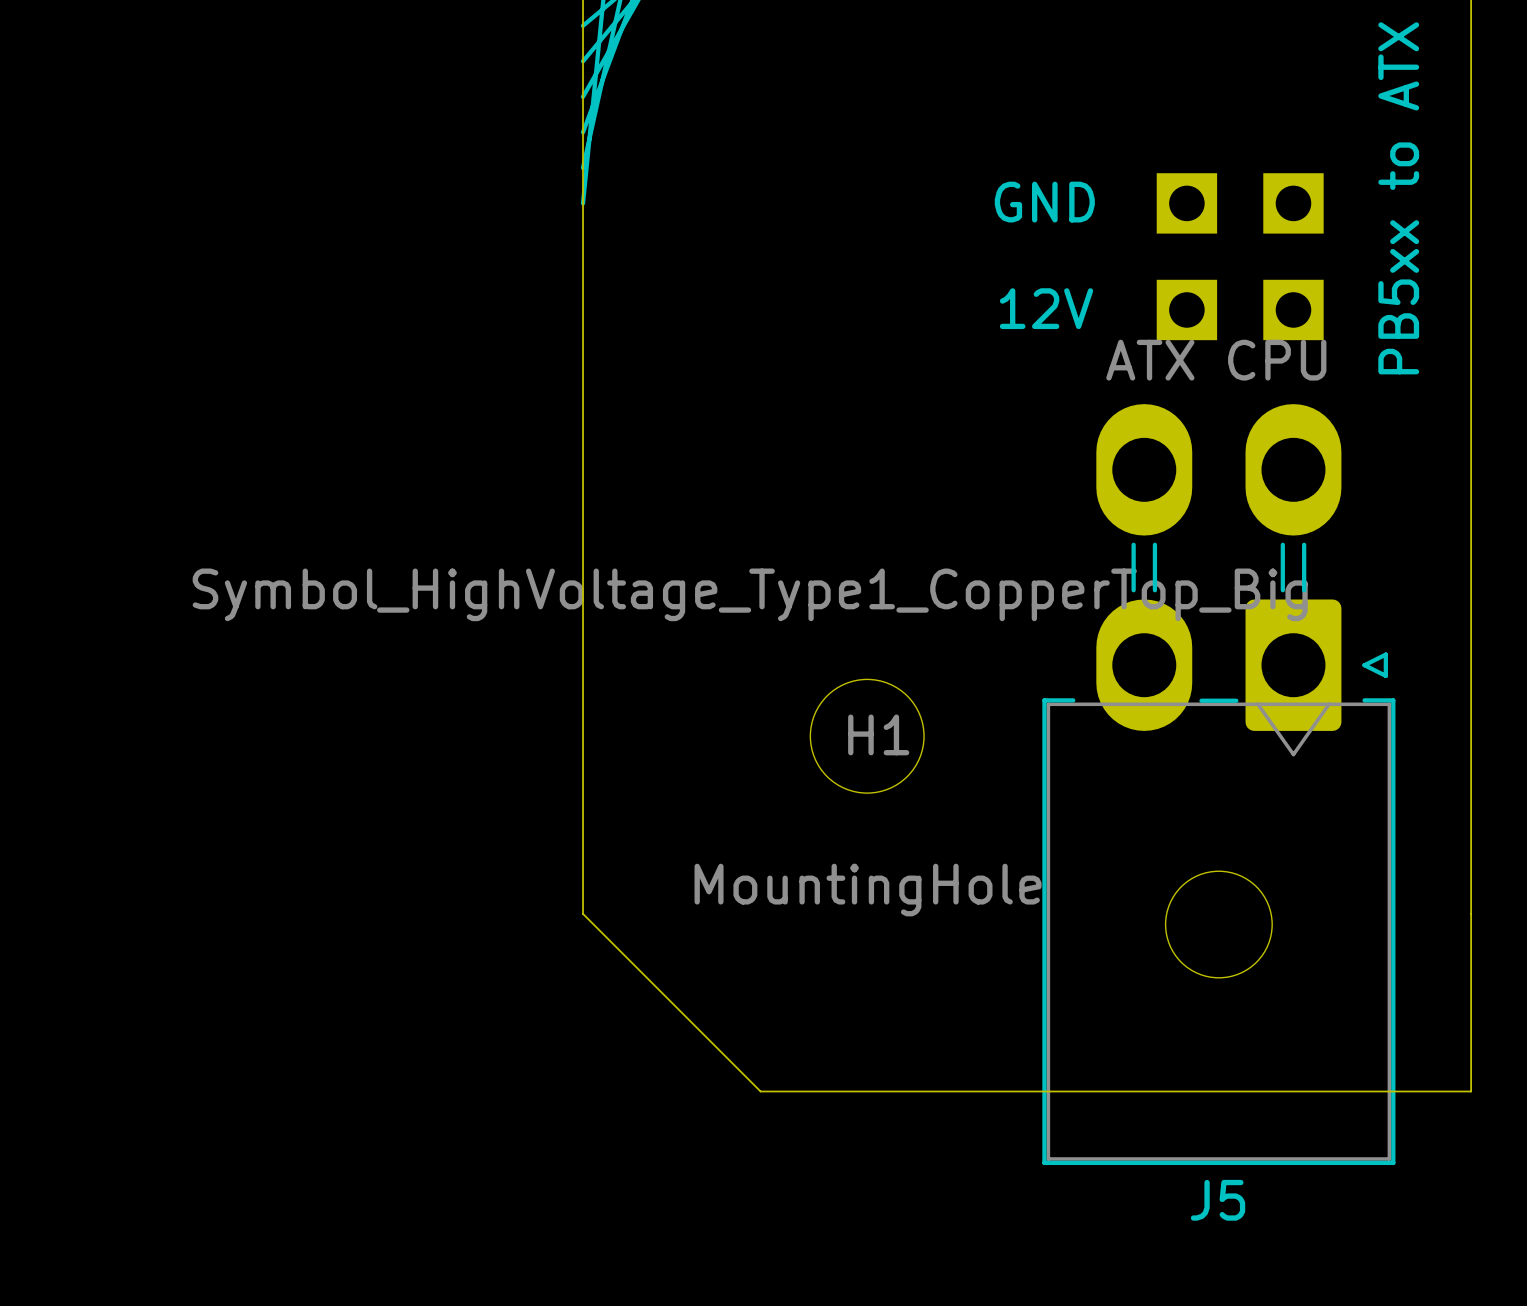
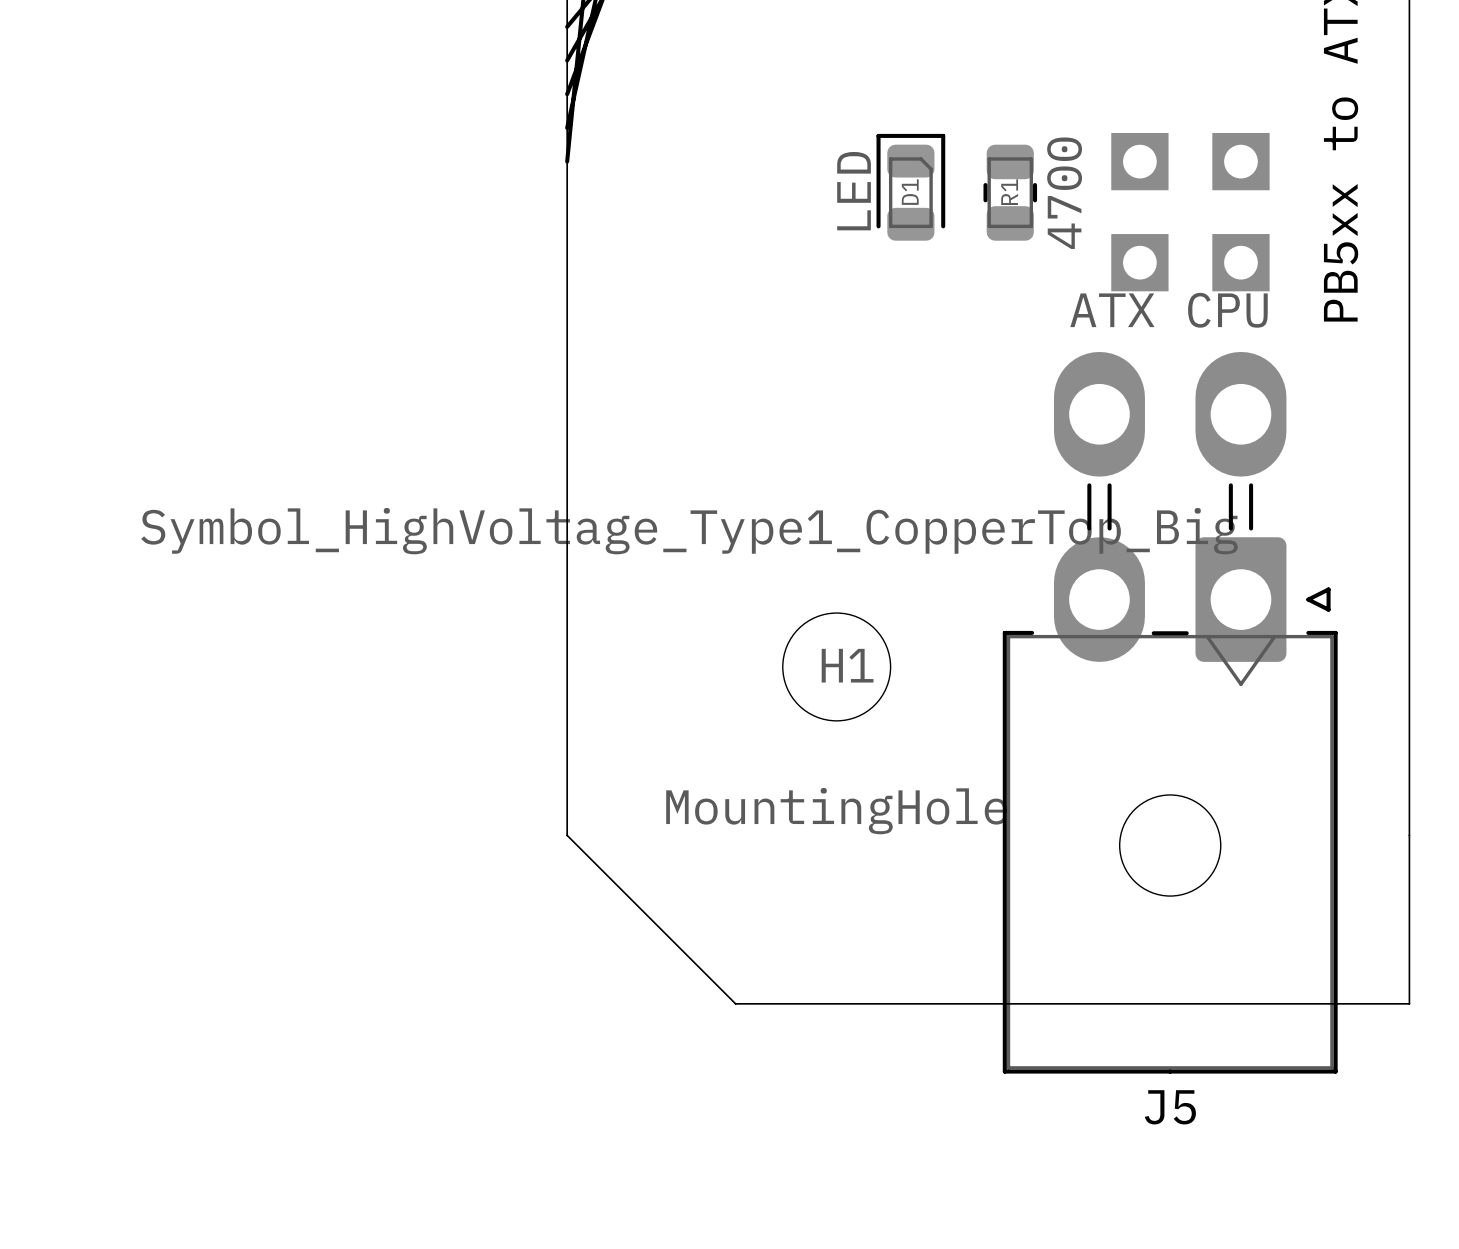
text: GND (1044, 202) -> none
D1: none -> LED (910, 187)
R1: none -> 4700 (1010, 192)
text: 12V (1046, 308) -> none
drawing position: (750, 594) -> (689, 531)

